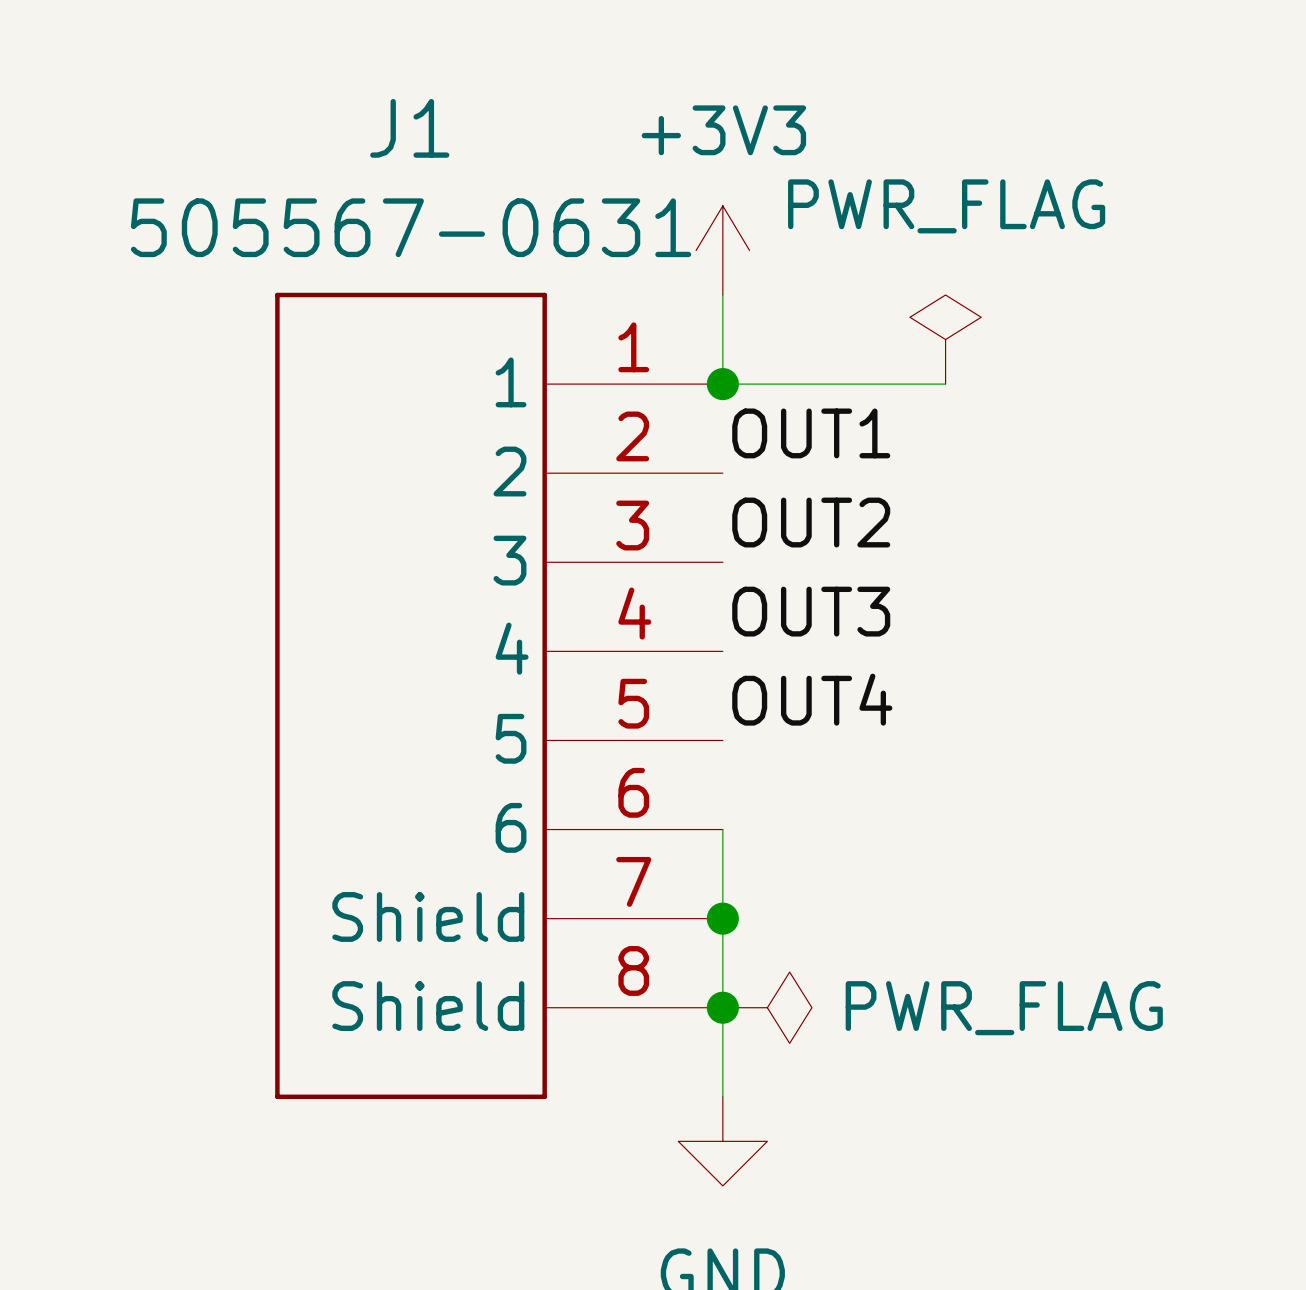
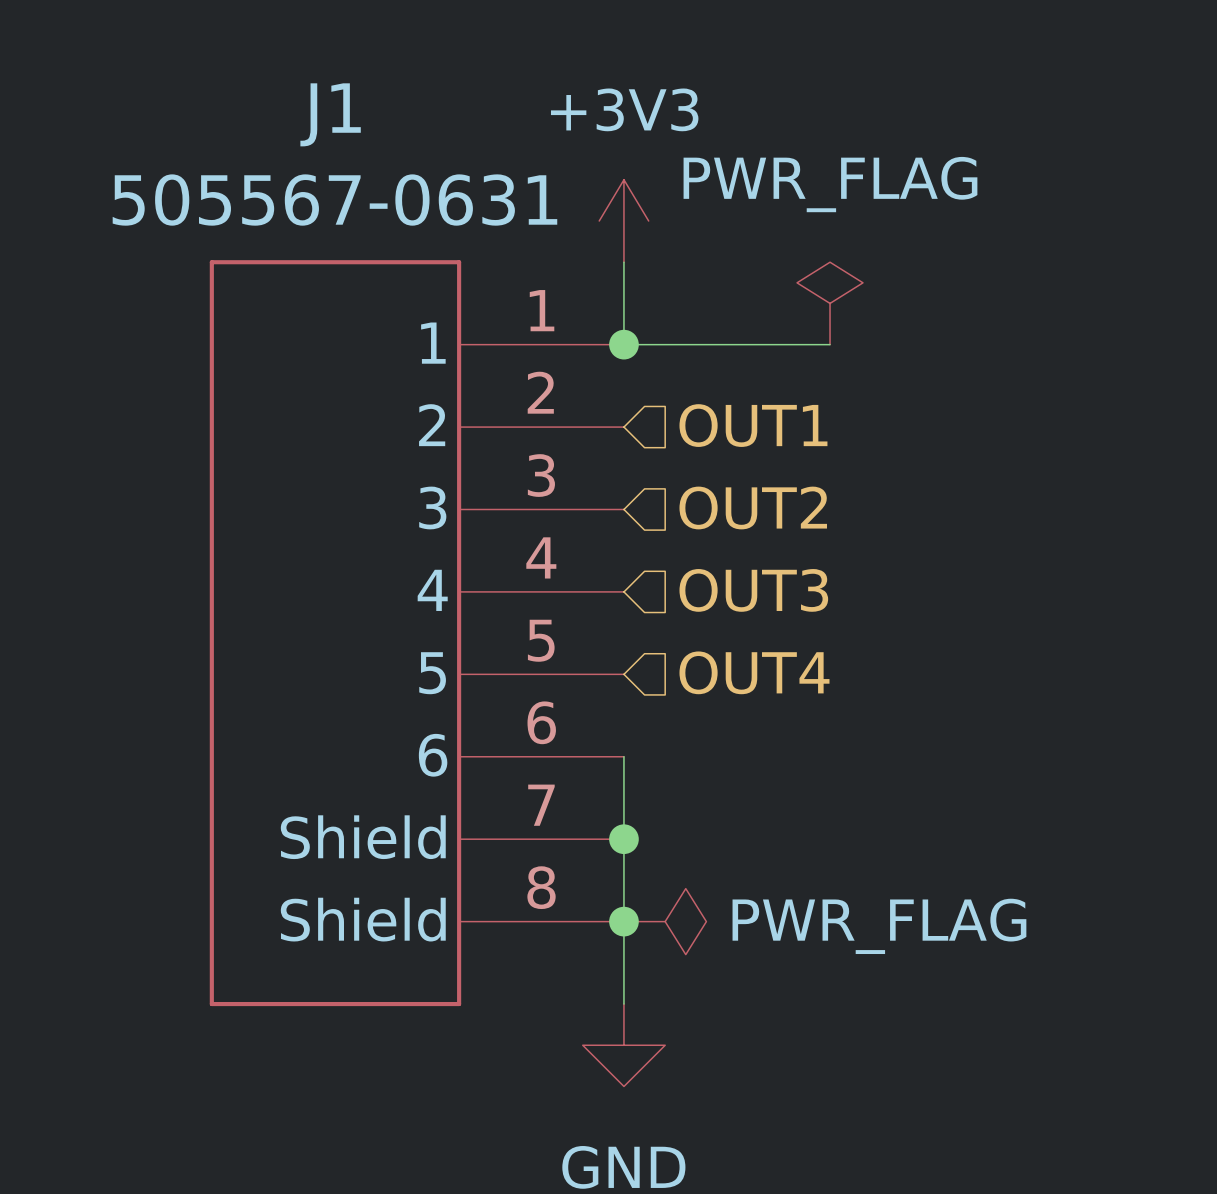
label: OUT1 (811, 433) -> none
hierarchical label: none -> OUT1 (753, 425)
label: OUT2 (811, 522) -> none
hierarchical label: none -> OUT2 (753, 507)
label: OUT3 (811, 611) -> none
hierarchical label: none -> OUT3 (753, 590)
label: OUT4 (812, 699) -> none
hierarchical label: none -> OUT4 (754, 672)

